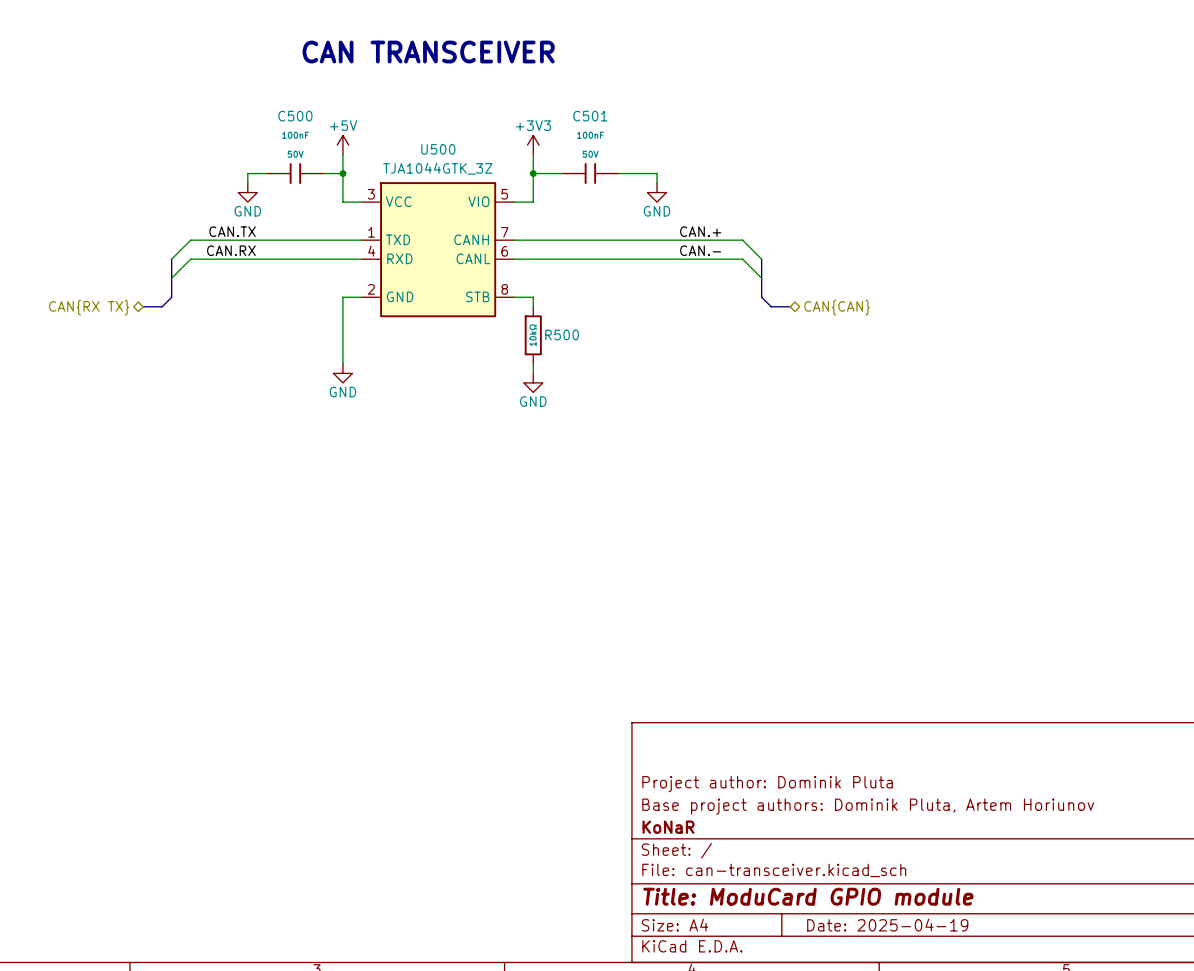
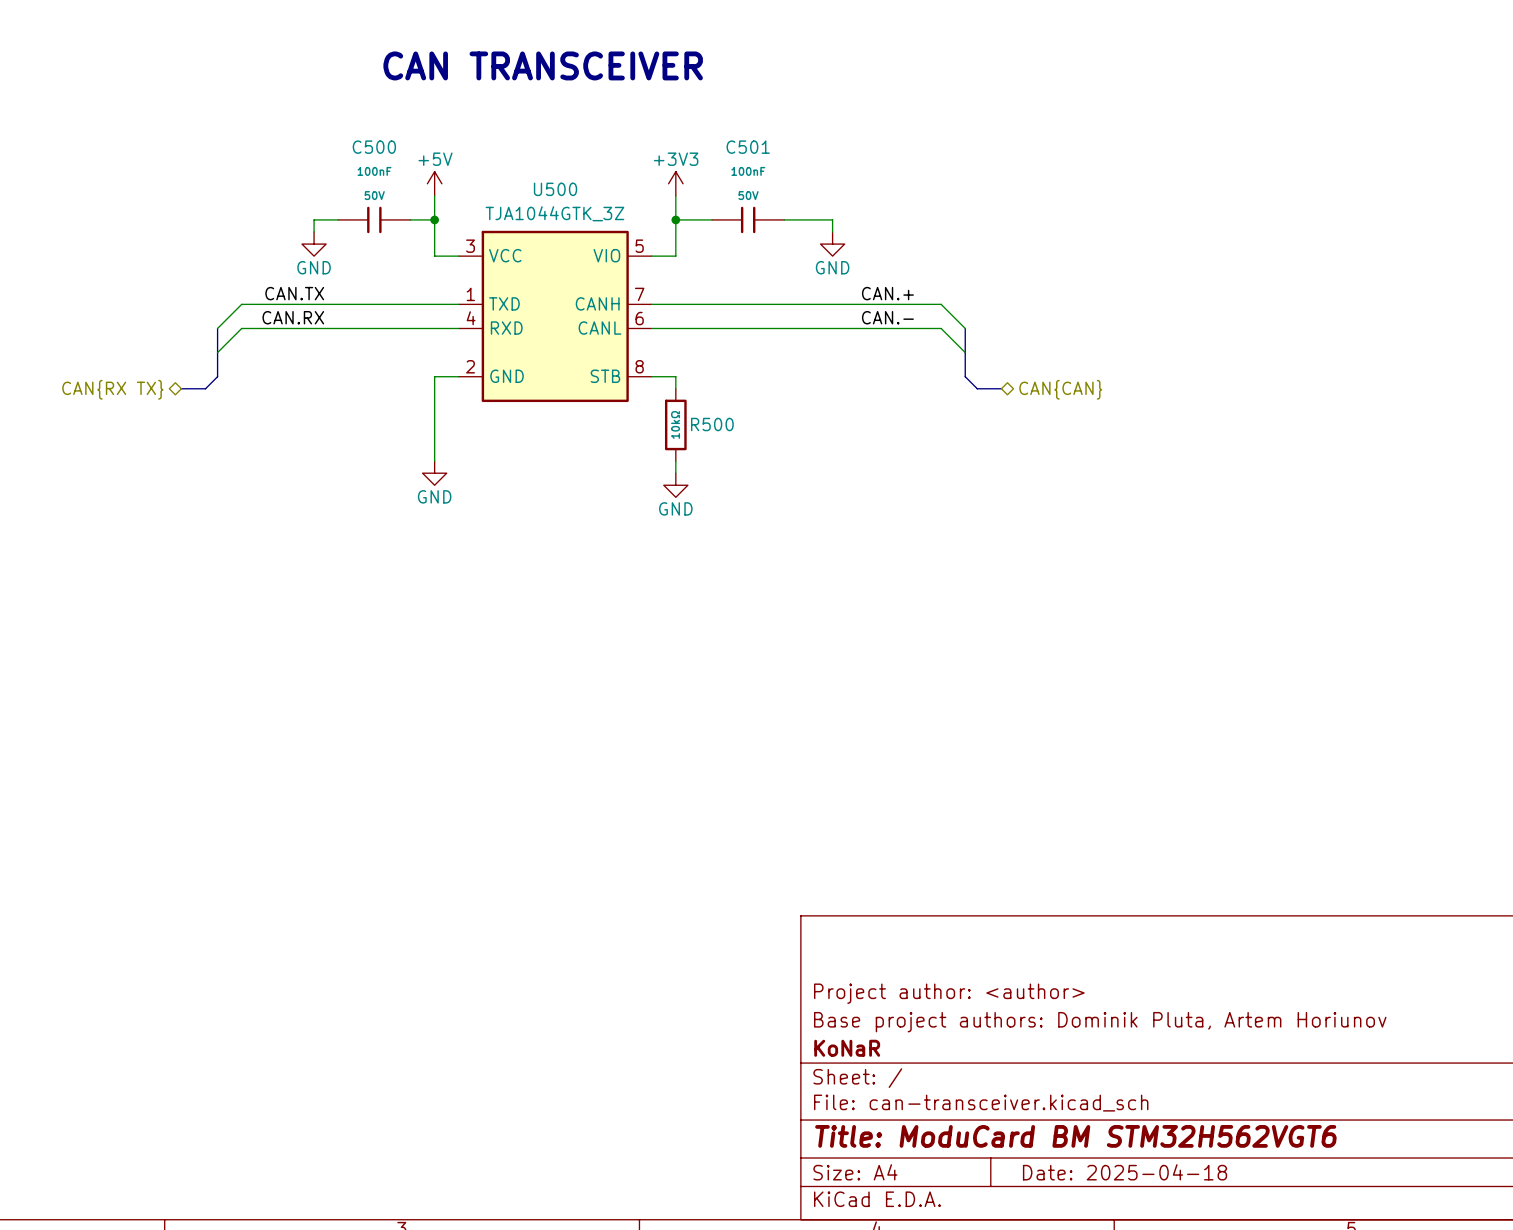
title block: Project author: Dominik Pluta (767, 784) -> Project author: <author> (949, 993)
title block: Title: ModuCard GPIO module (808, 896) -> Title: ModuCard BM STM32H562VGT6 (1075, 1136)
title block: Date: 2025-04-19 (887, 925) -> Date: 2025-04-18 (1125, 1172)

